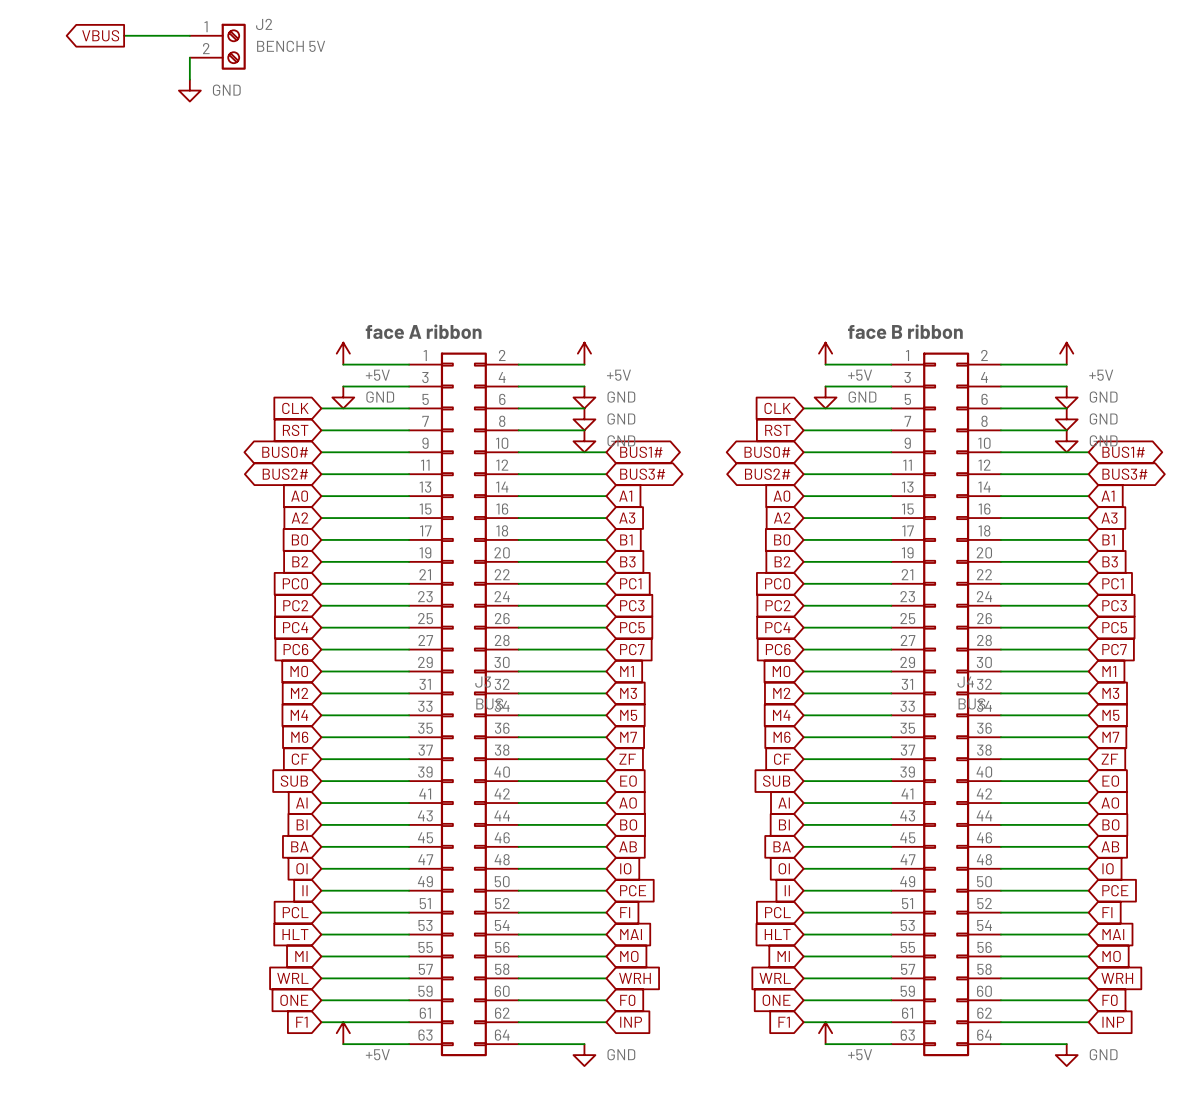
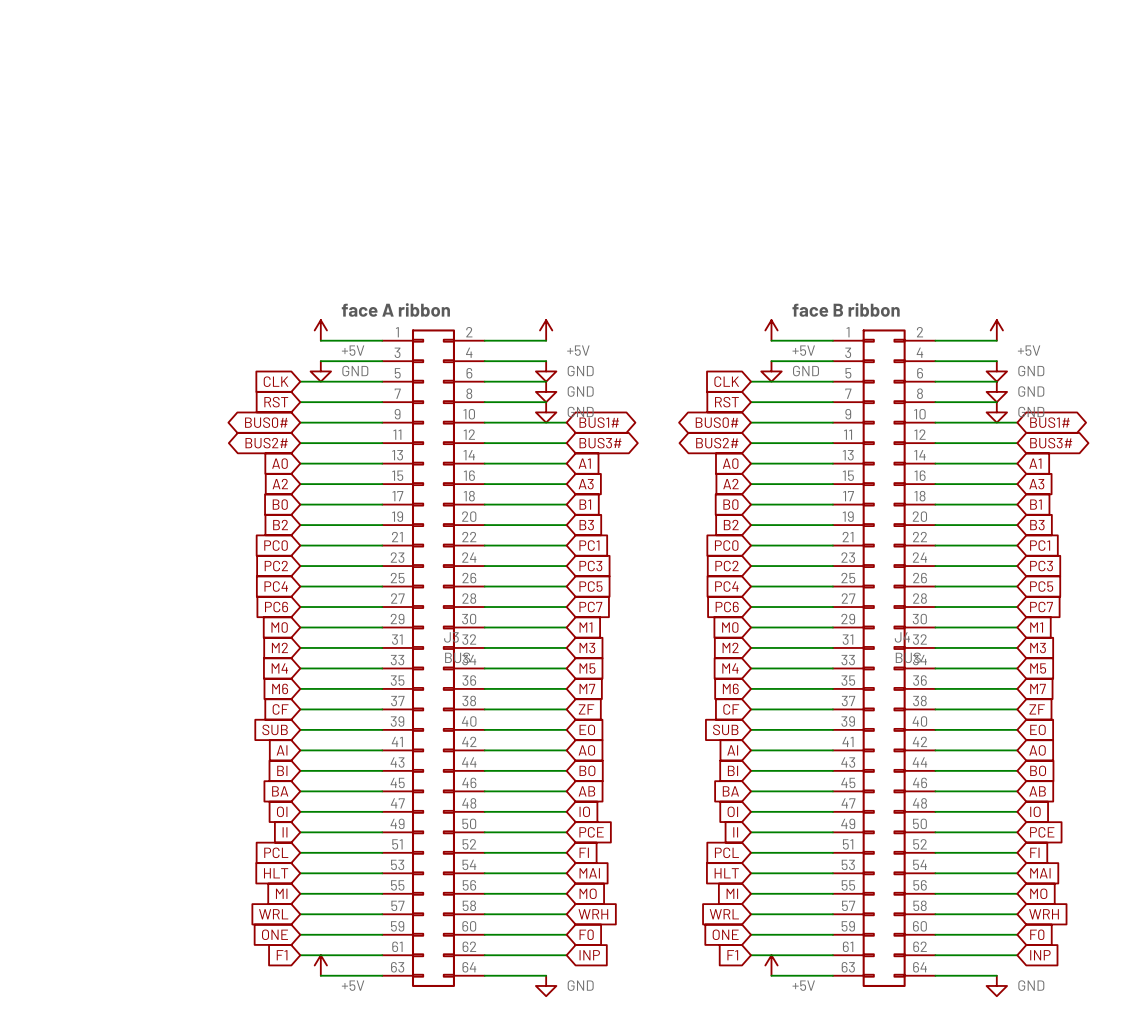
global label: VBUS (100, 35) -> none
wire: (124, 35) (189, 35) -> none
J2: BENCH 5V (217, 46) -> none
wire: (189, 57) (189, 79) -> none
power symbol: GND (189, 90) -> none

